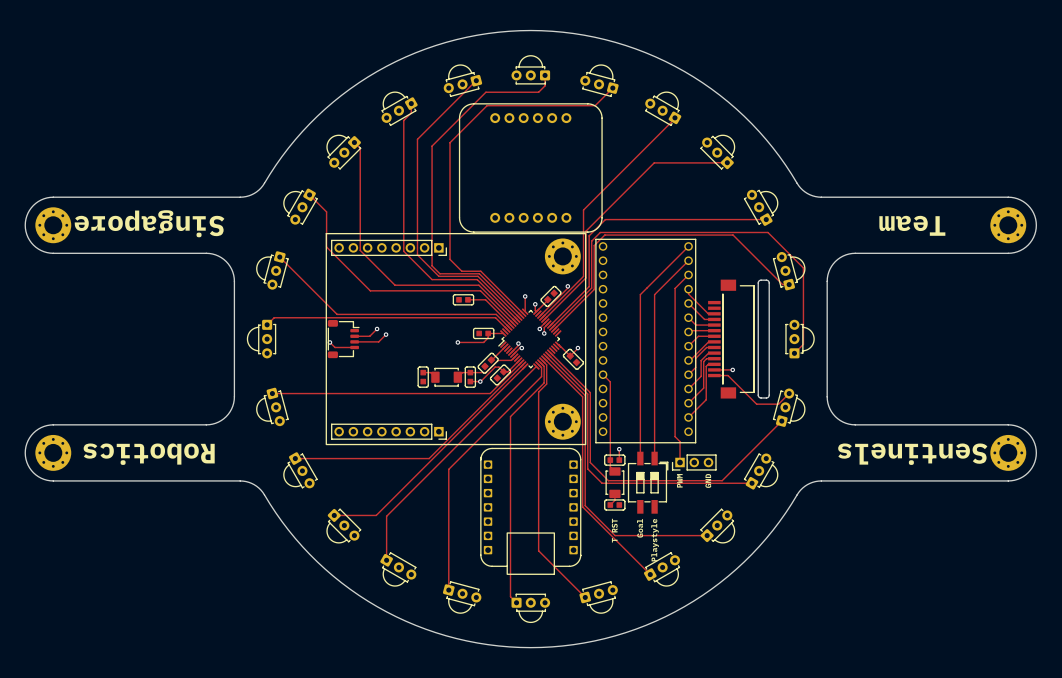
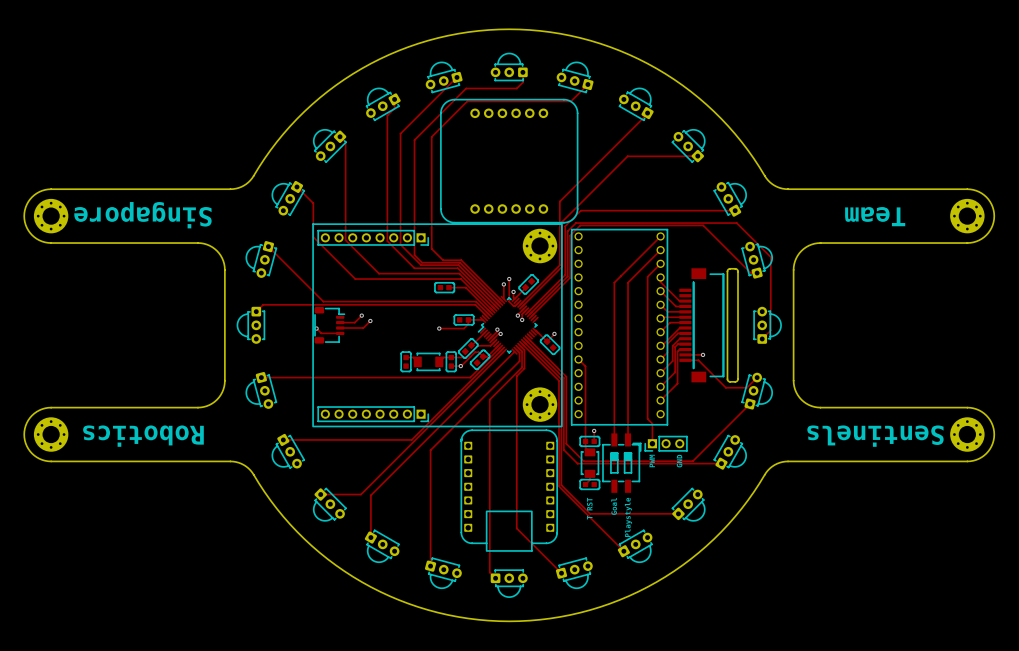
track: (567, 286) (540, 315) -> (509, 279) (509, 301) (513, 305) (518, 302)
via: (567, 286) -> none
via: none -> (509, 279)

